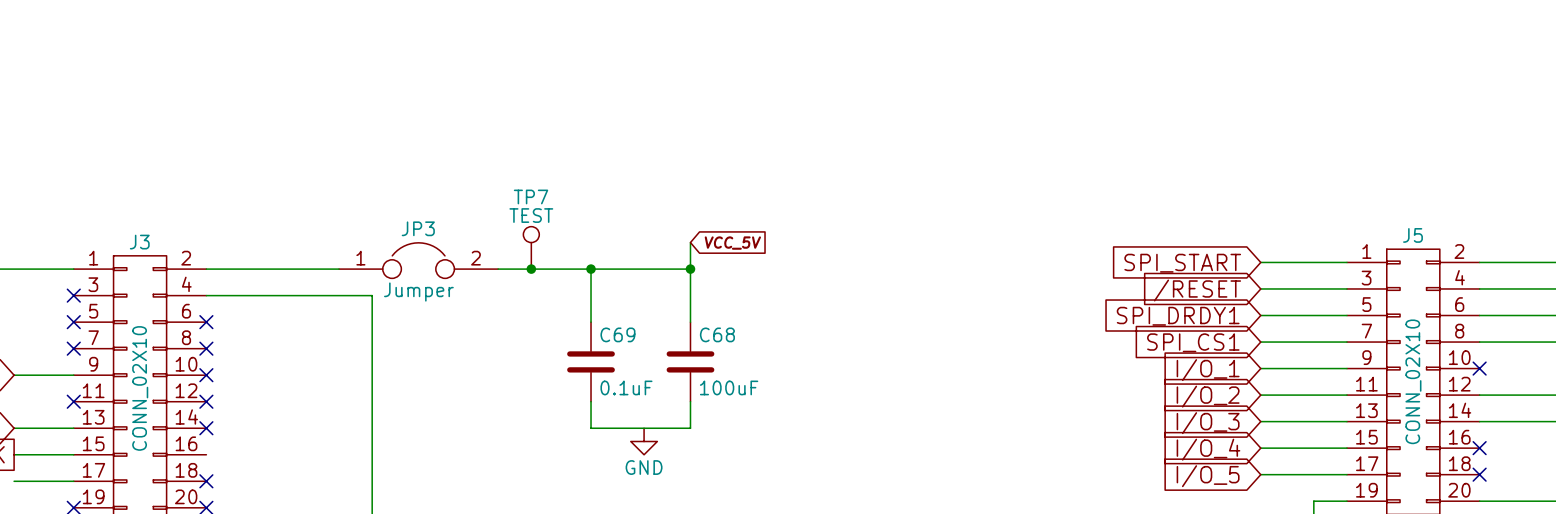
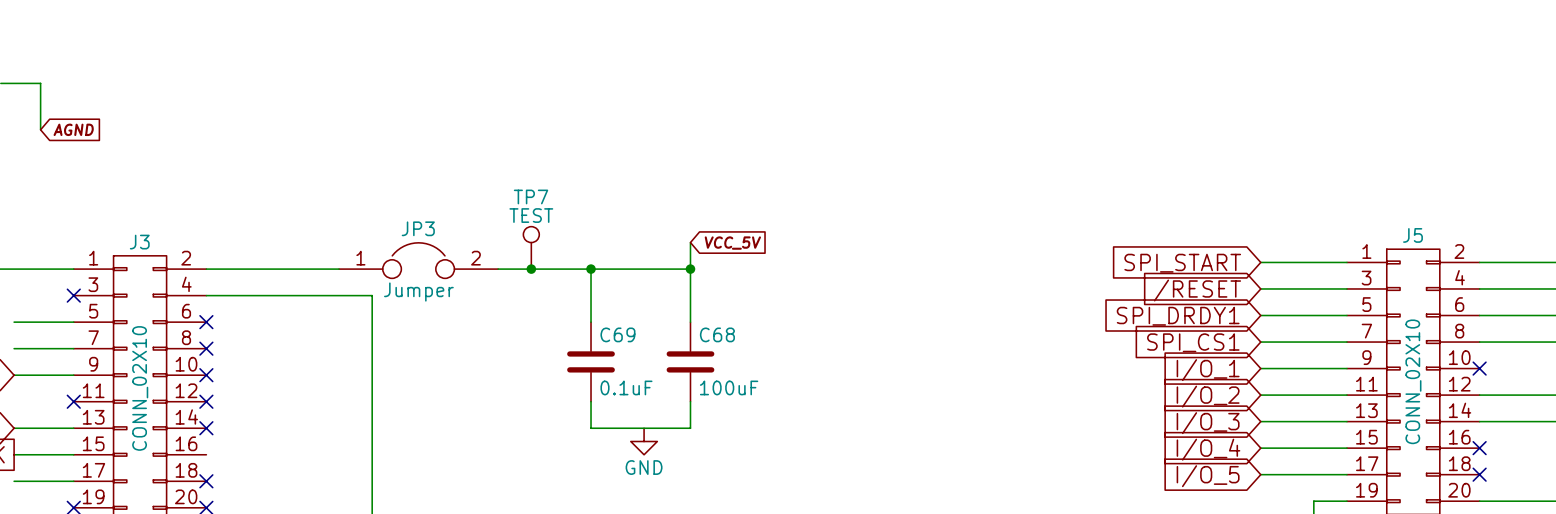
wire: none -> (0, 83) (40, 83) (40, 129)
global label: none -> AGND (73, 129)
wire: none -> (14, 322) (73, 322)
no-connect mark: (73, 322) -> none
wire: none -> (14, 348) (73, 348)
no-connect mark: (73, 348) -> none

